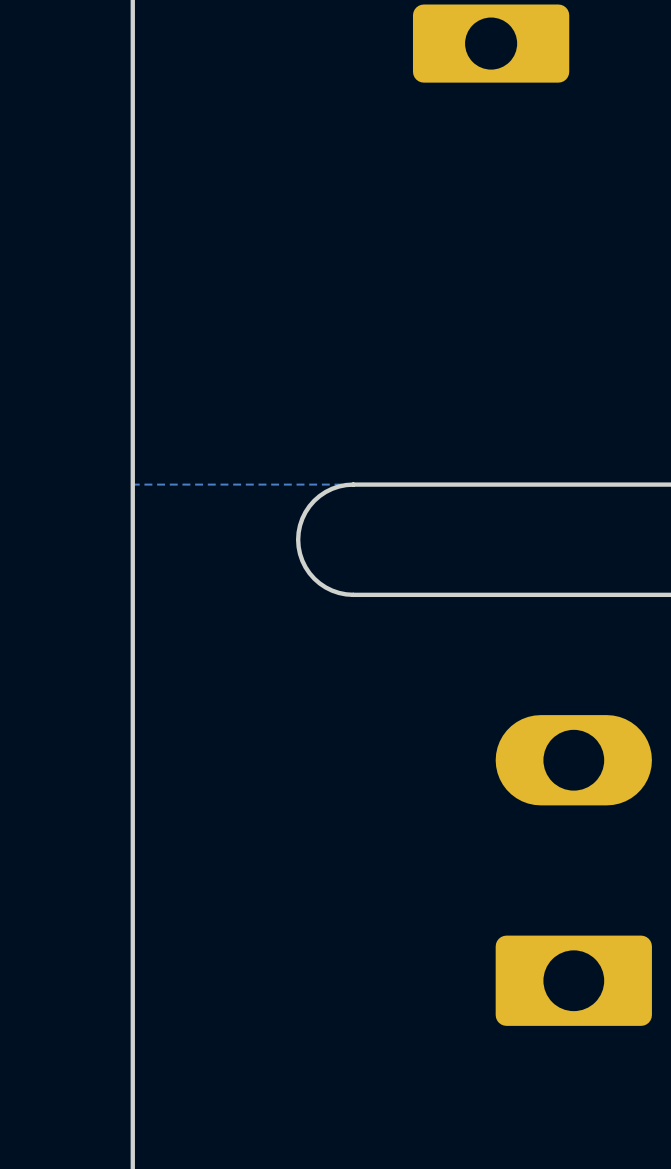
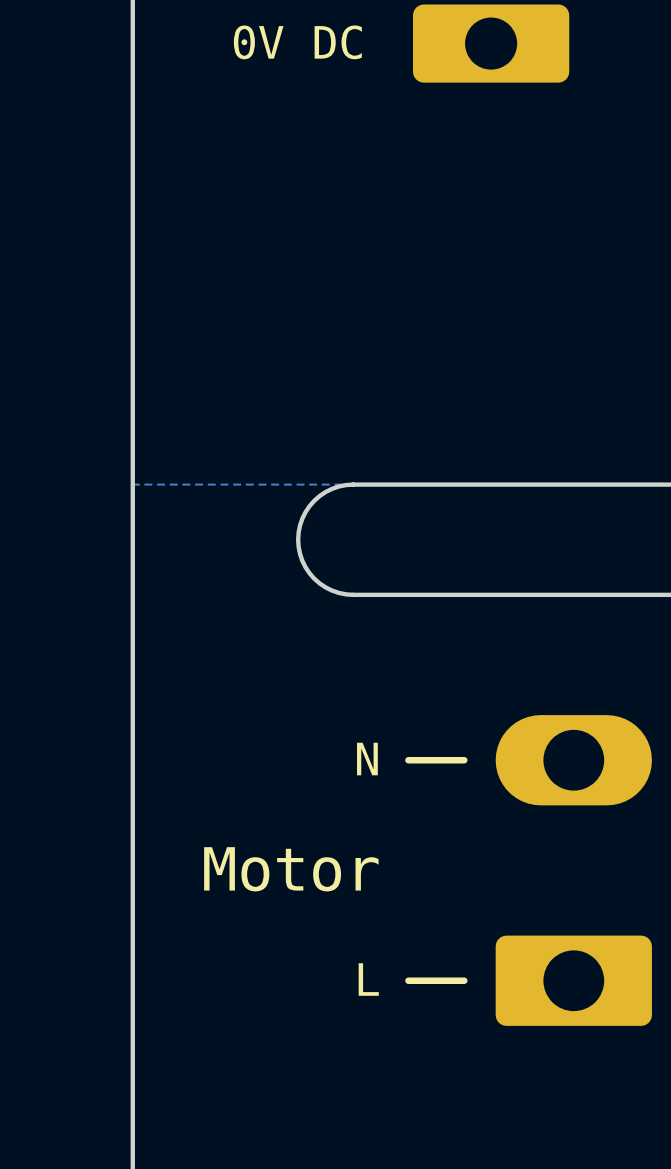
text: none -> 0V DC (297, 42)
text: none -> N (367, 759)
line: none -> (464, 760) (408, 760)
text: none -> Motor (291, 869)
text: none -> L (368, 979)
line: none -> (464, 980) (408, 980)

